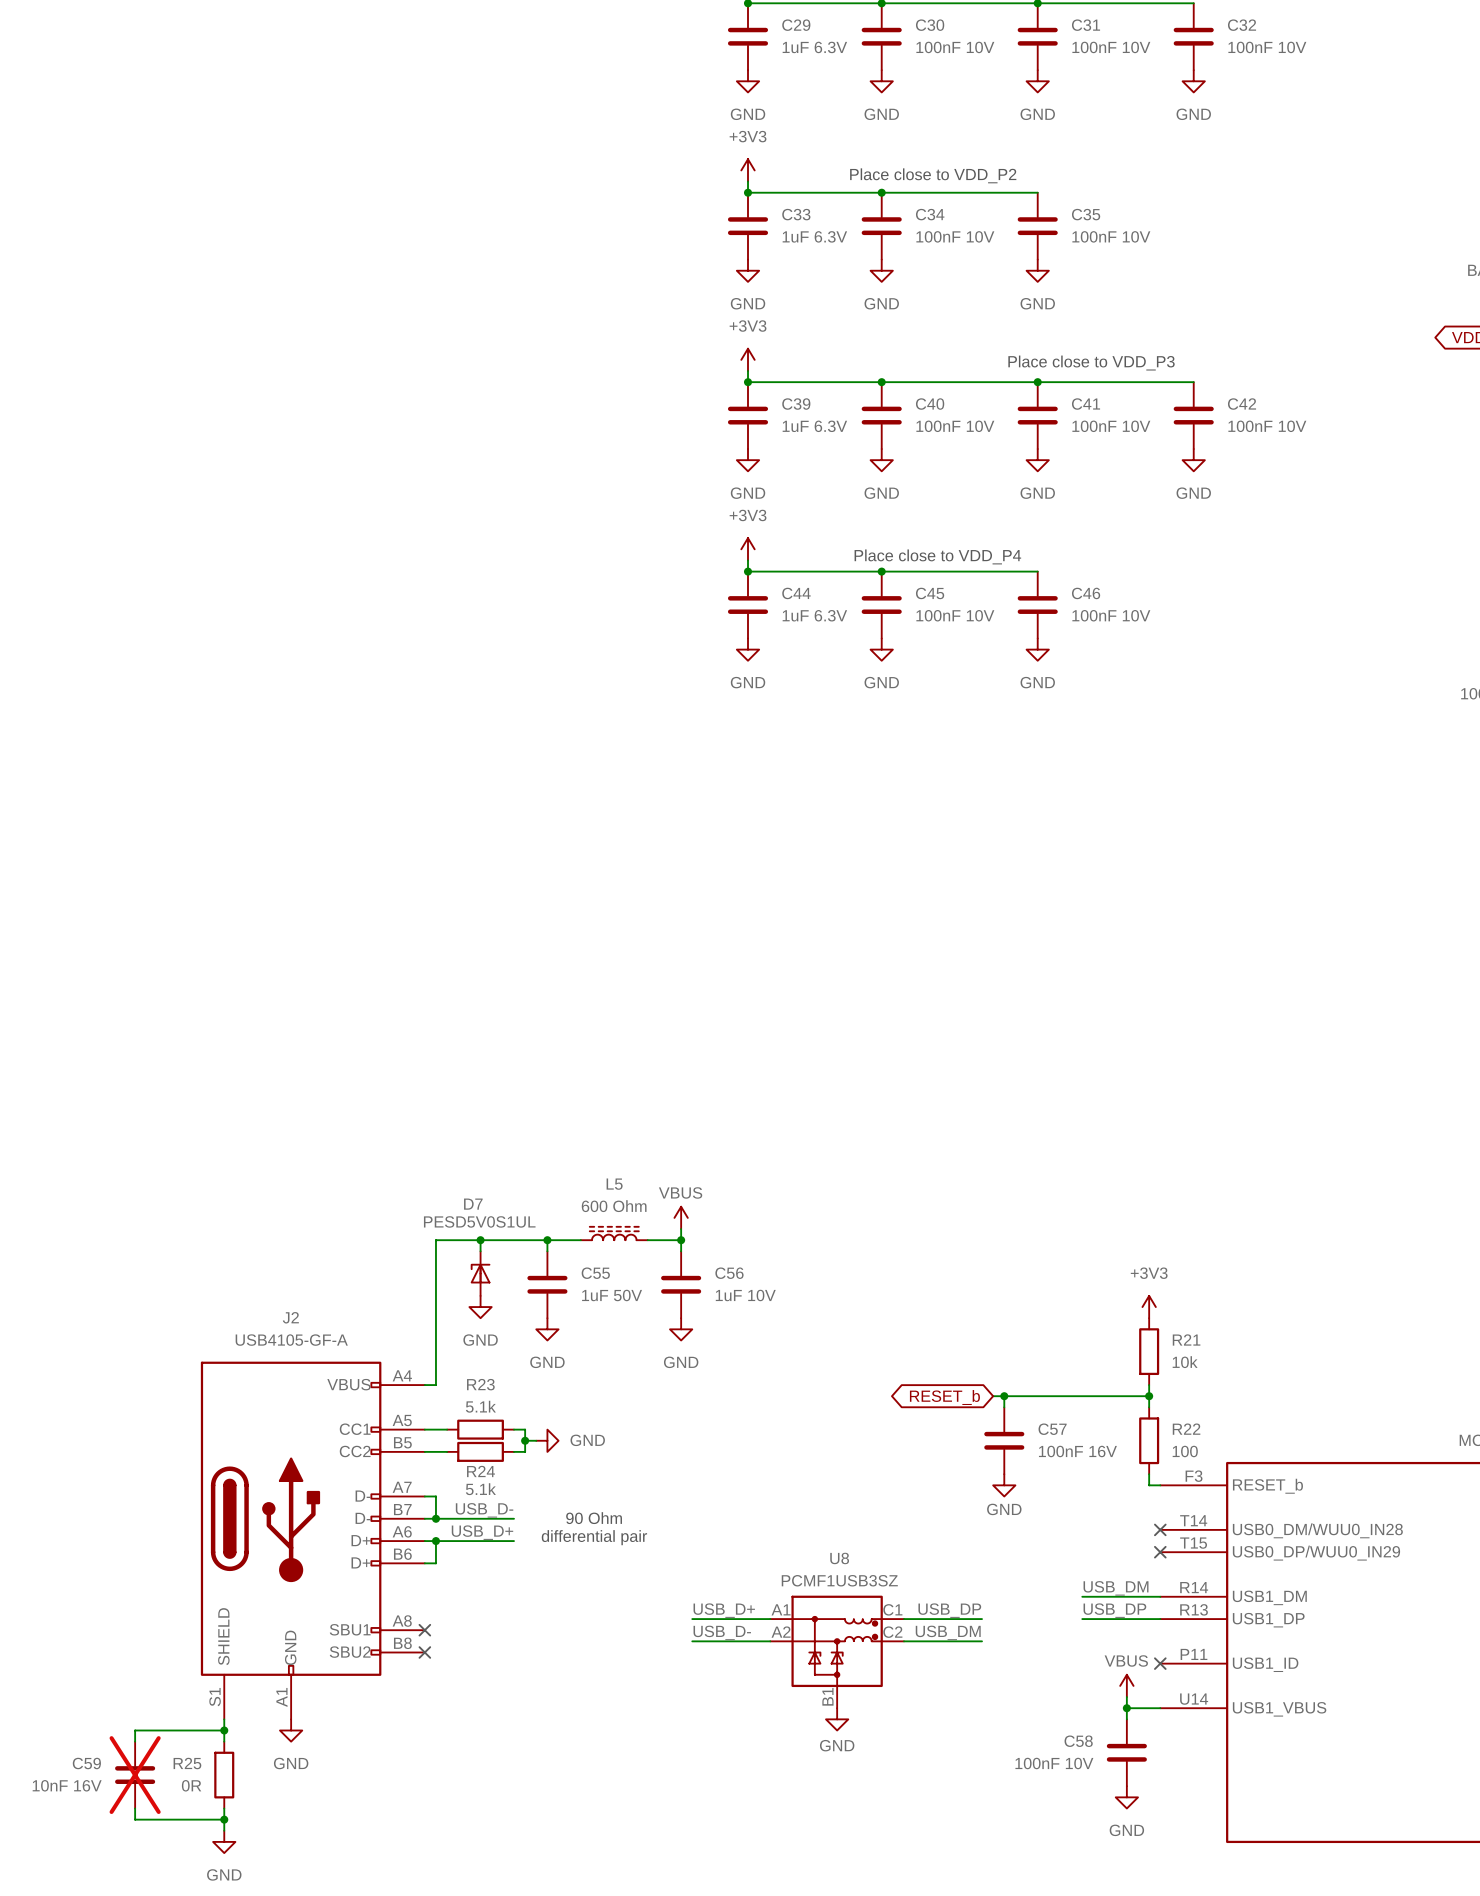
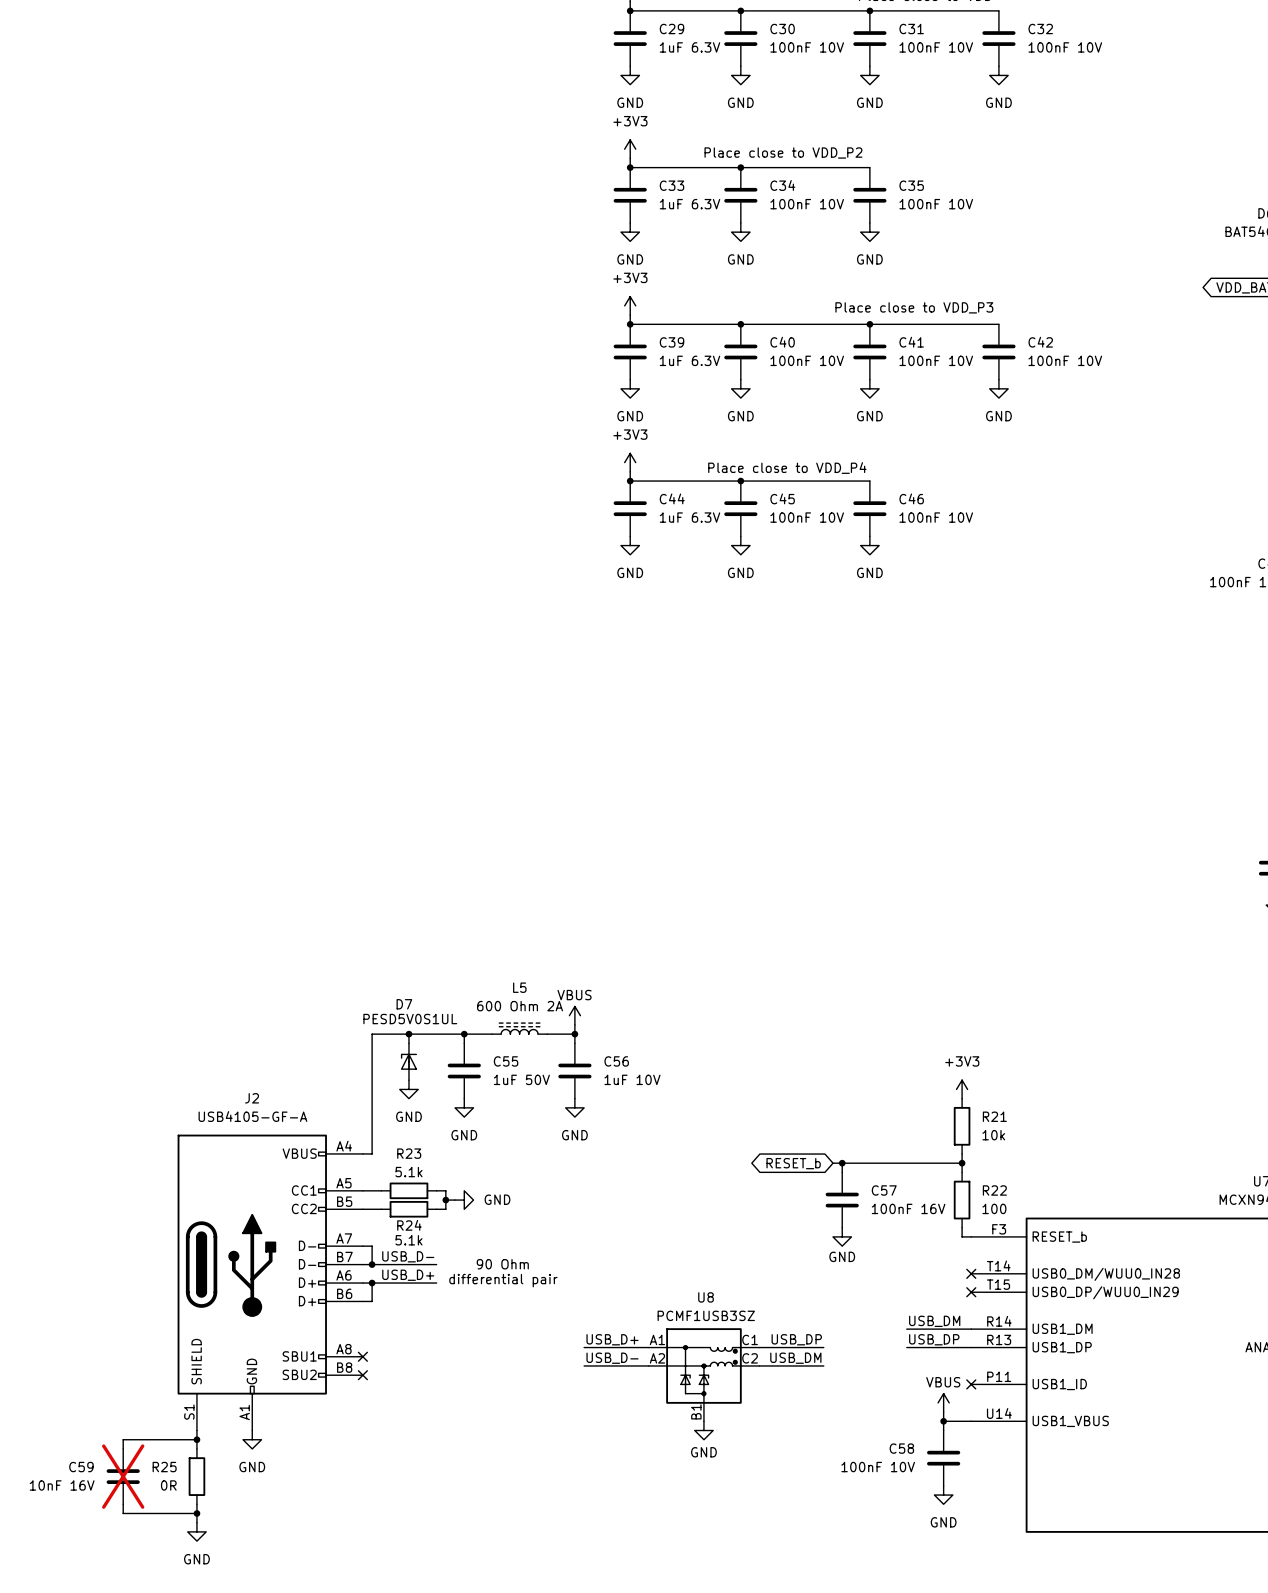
L5 value: 600 Ohm (614, 1206) -> 600 Ohm 2A (520, 1006)

